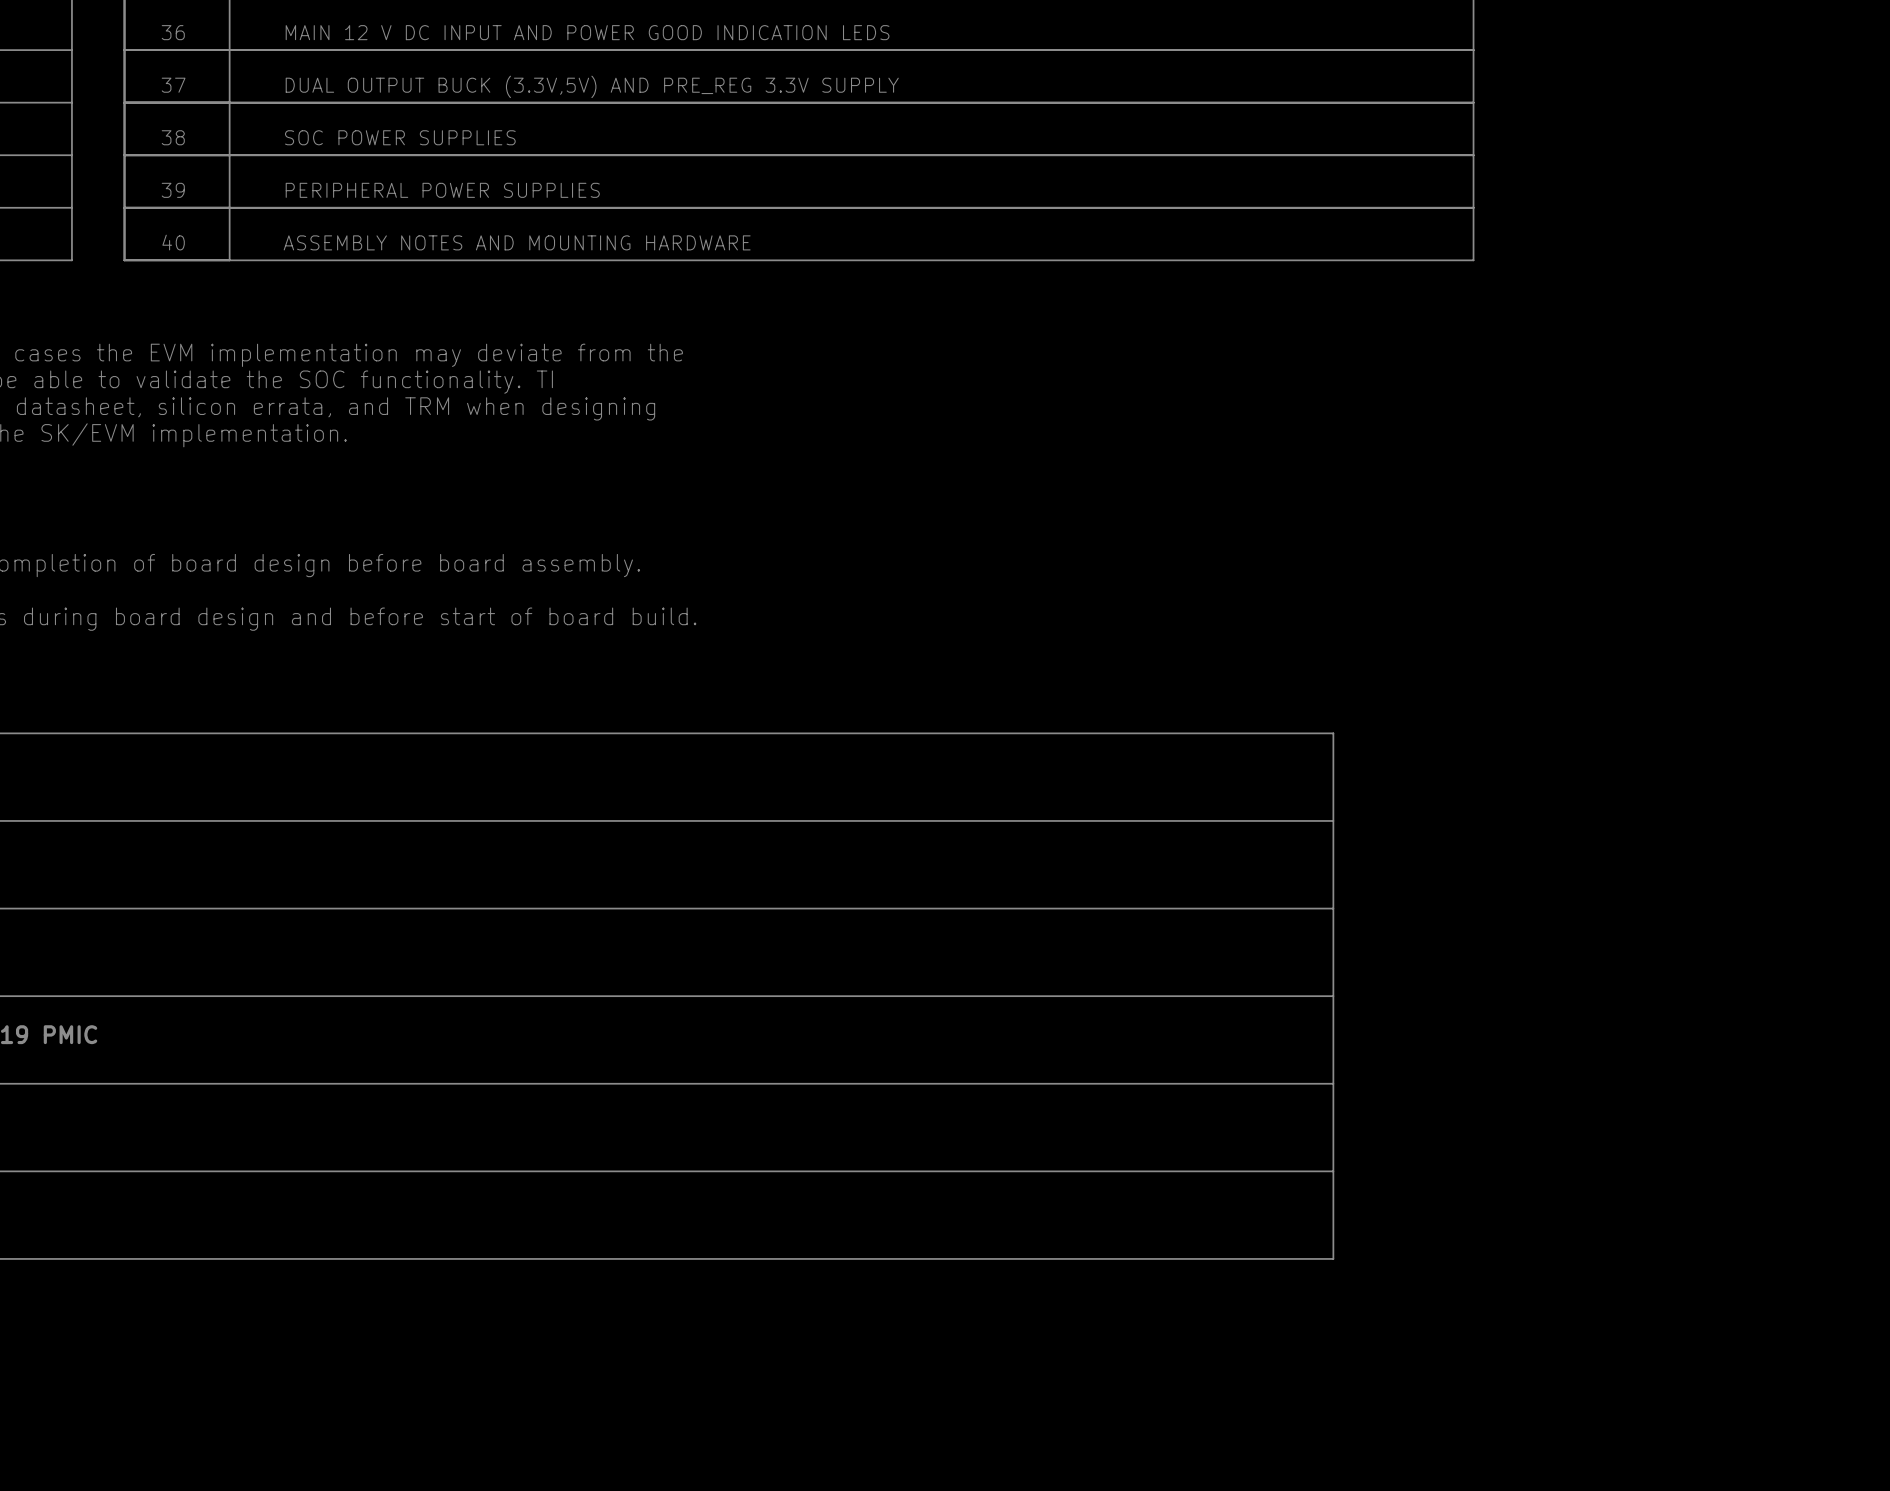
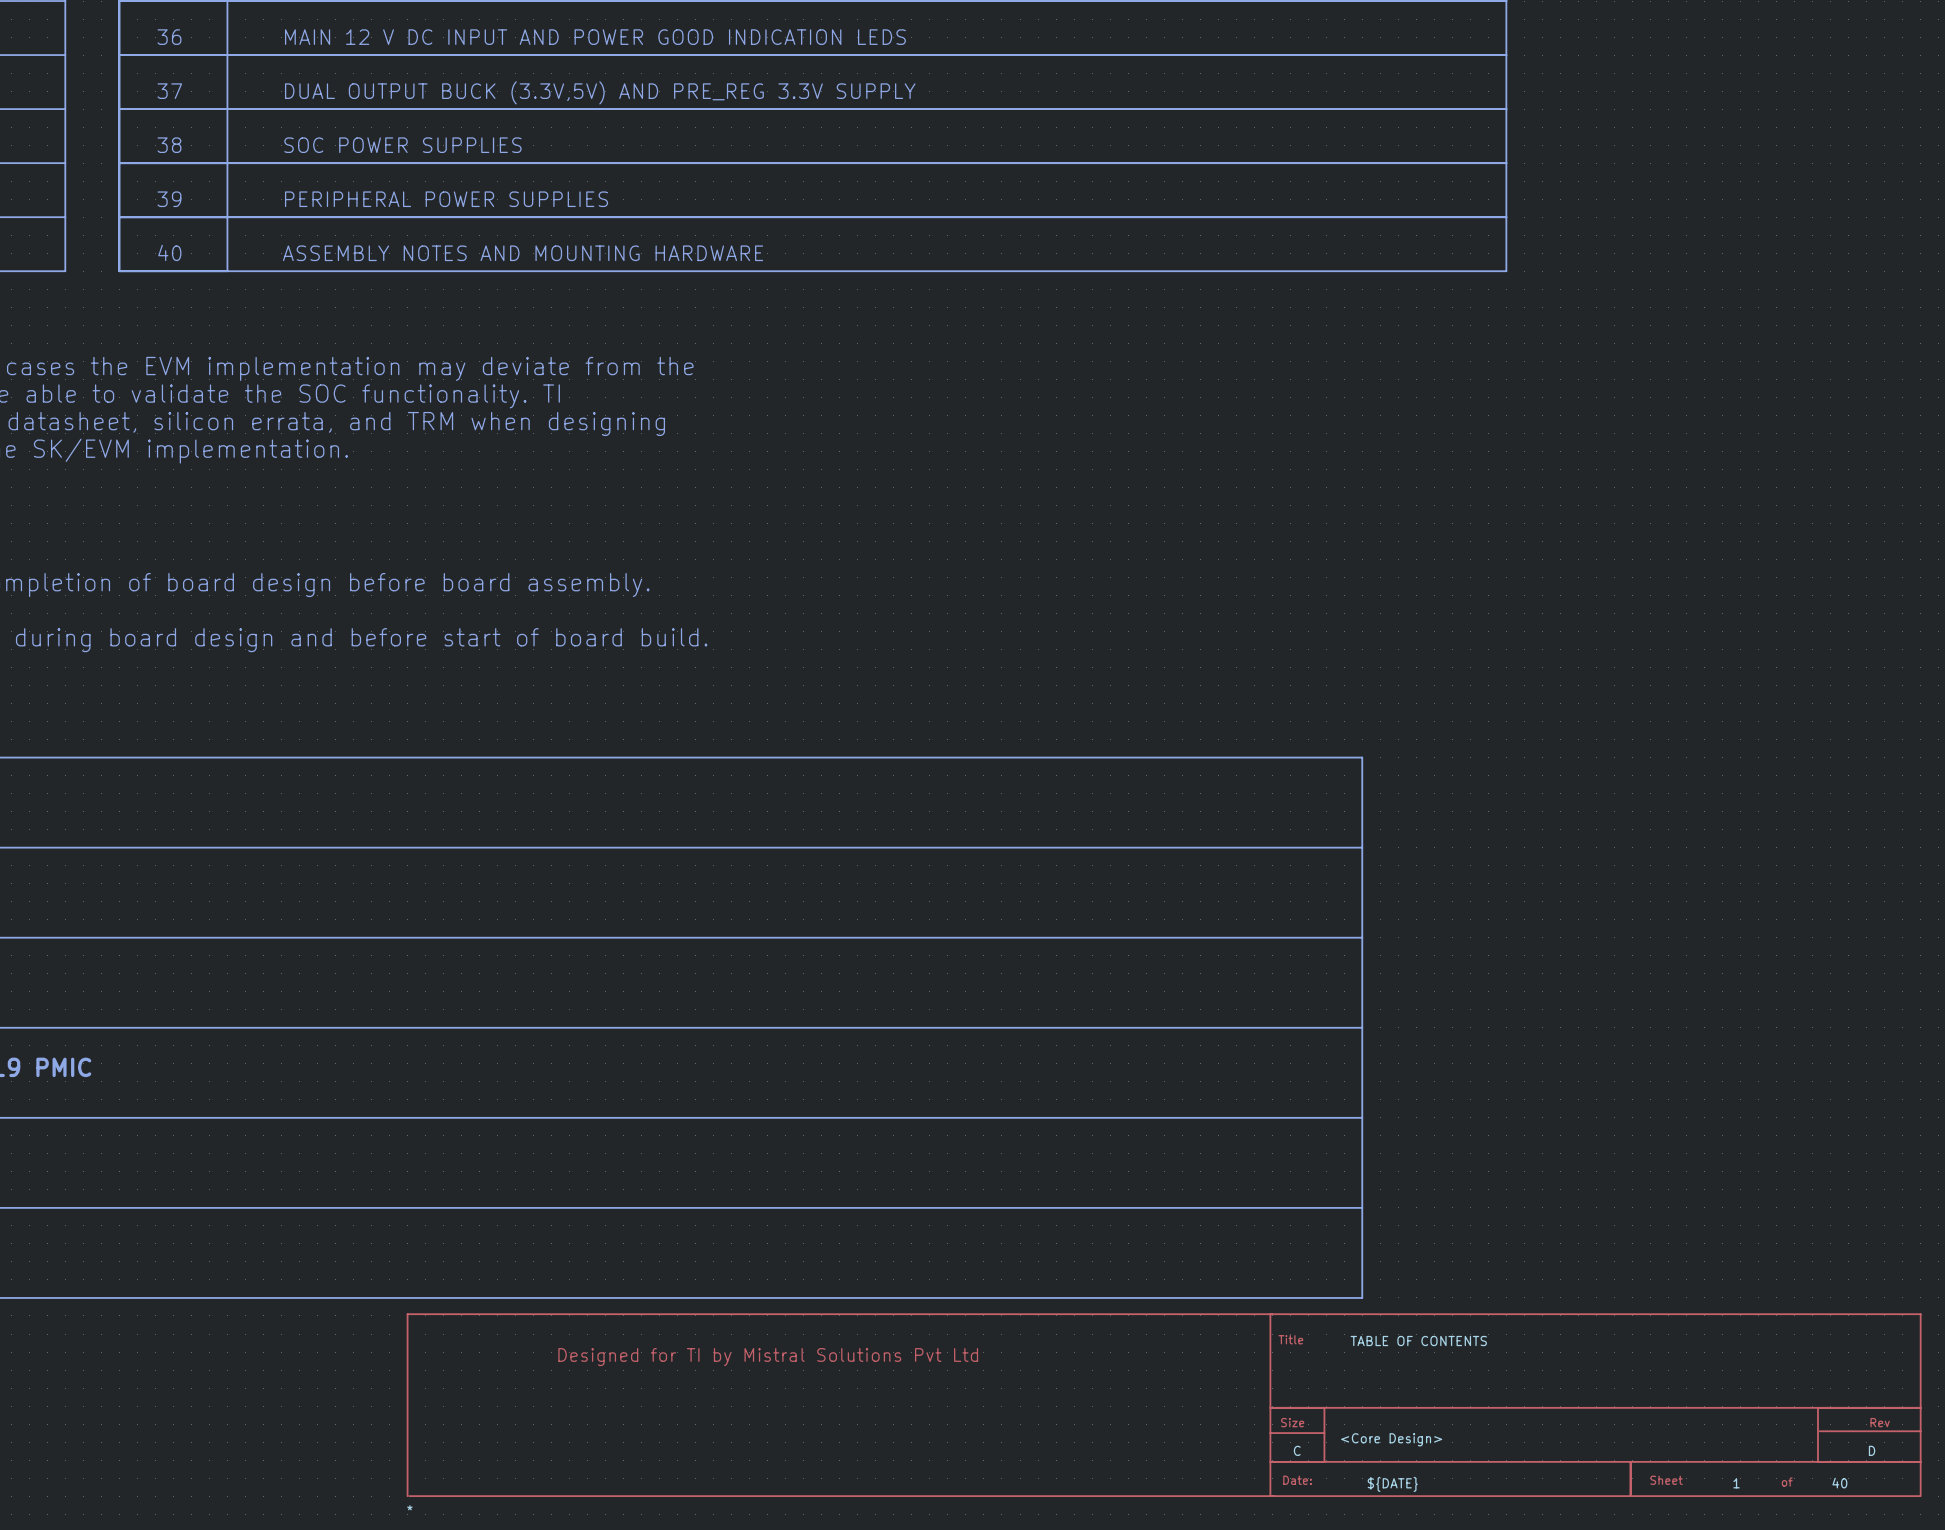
part: none -> (1164, 1405)

